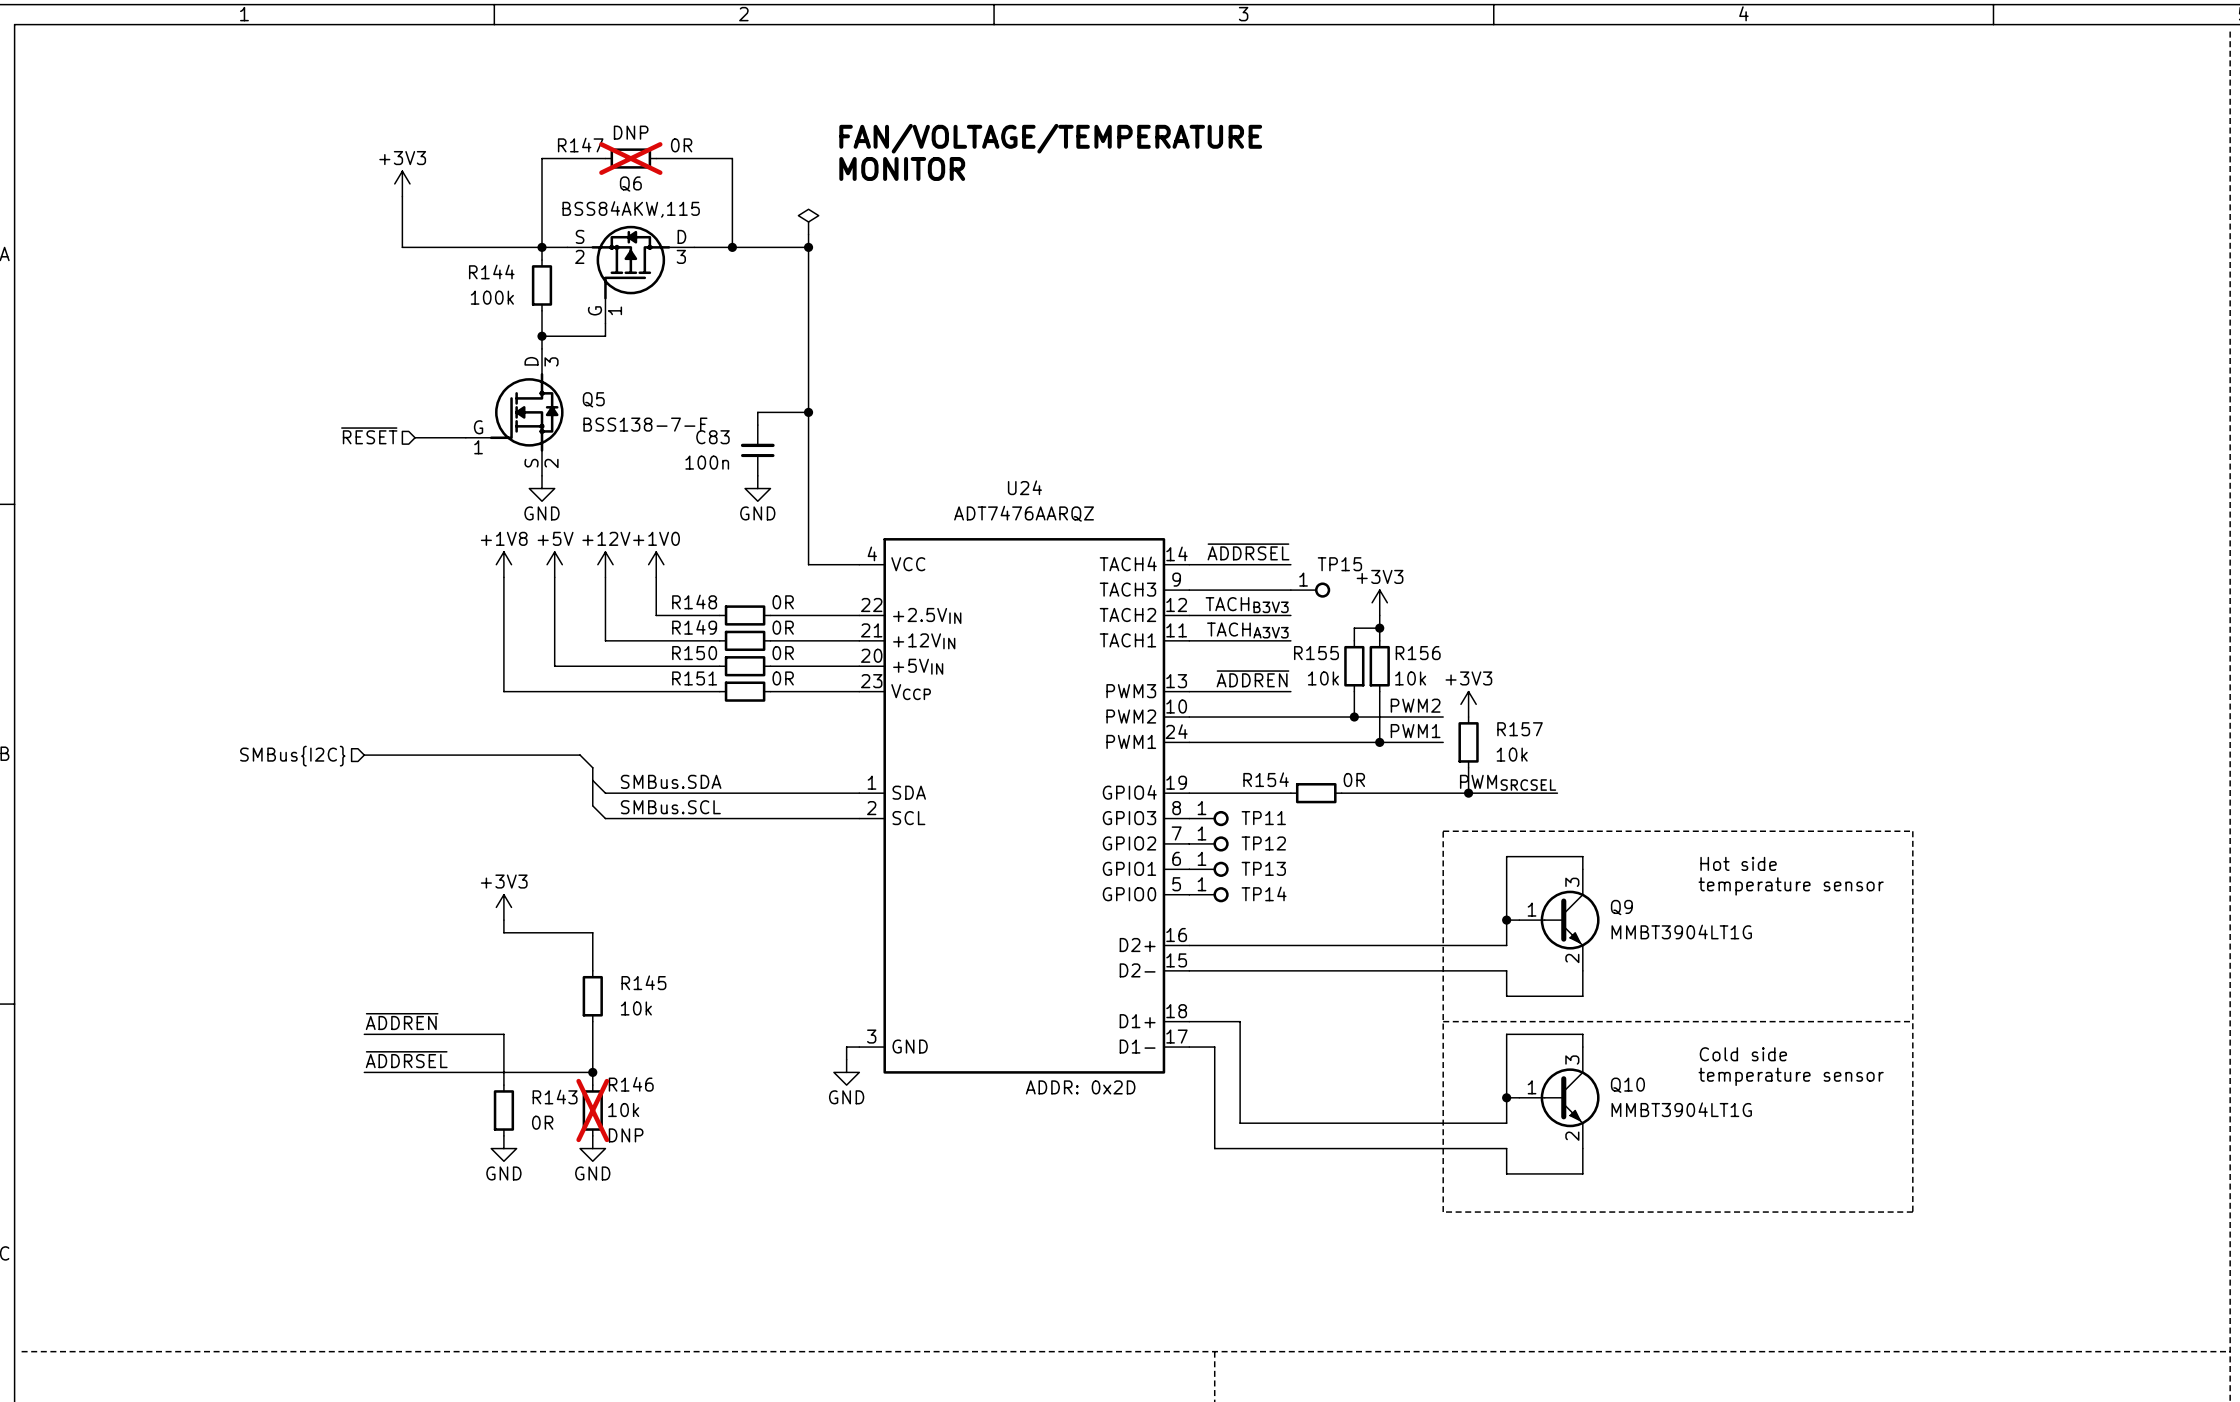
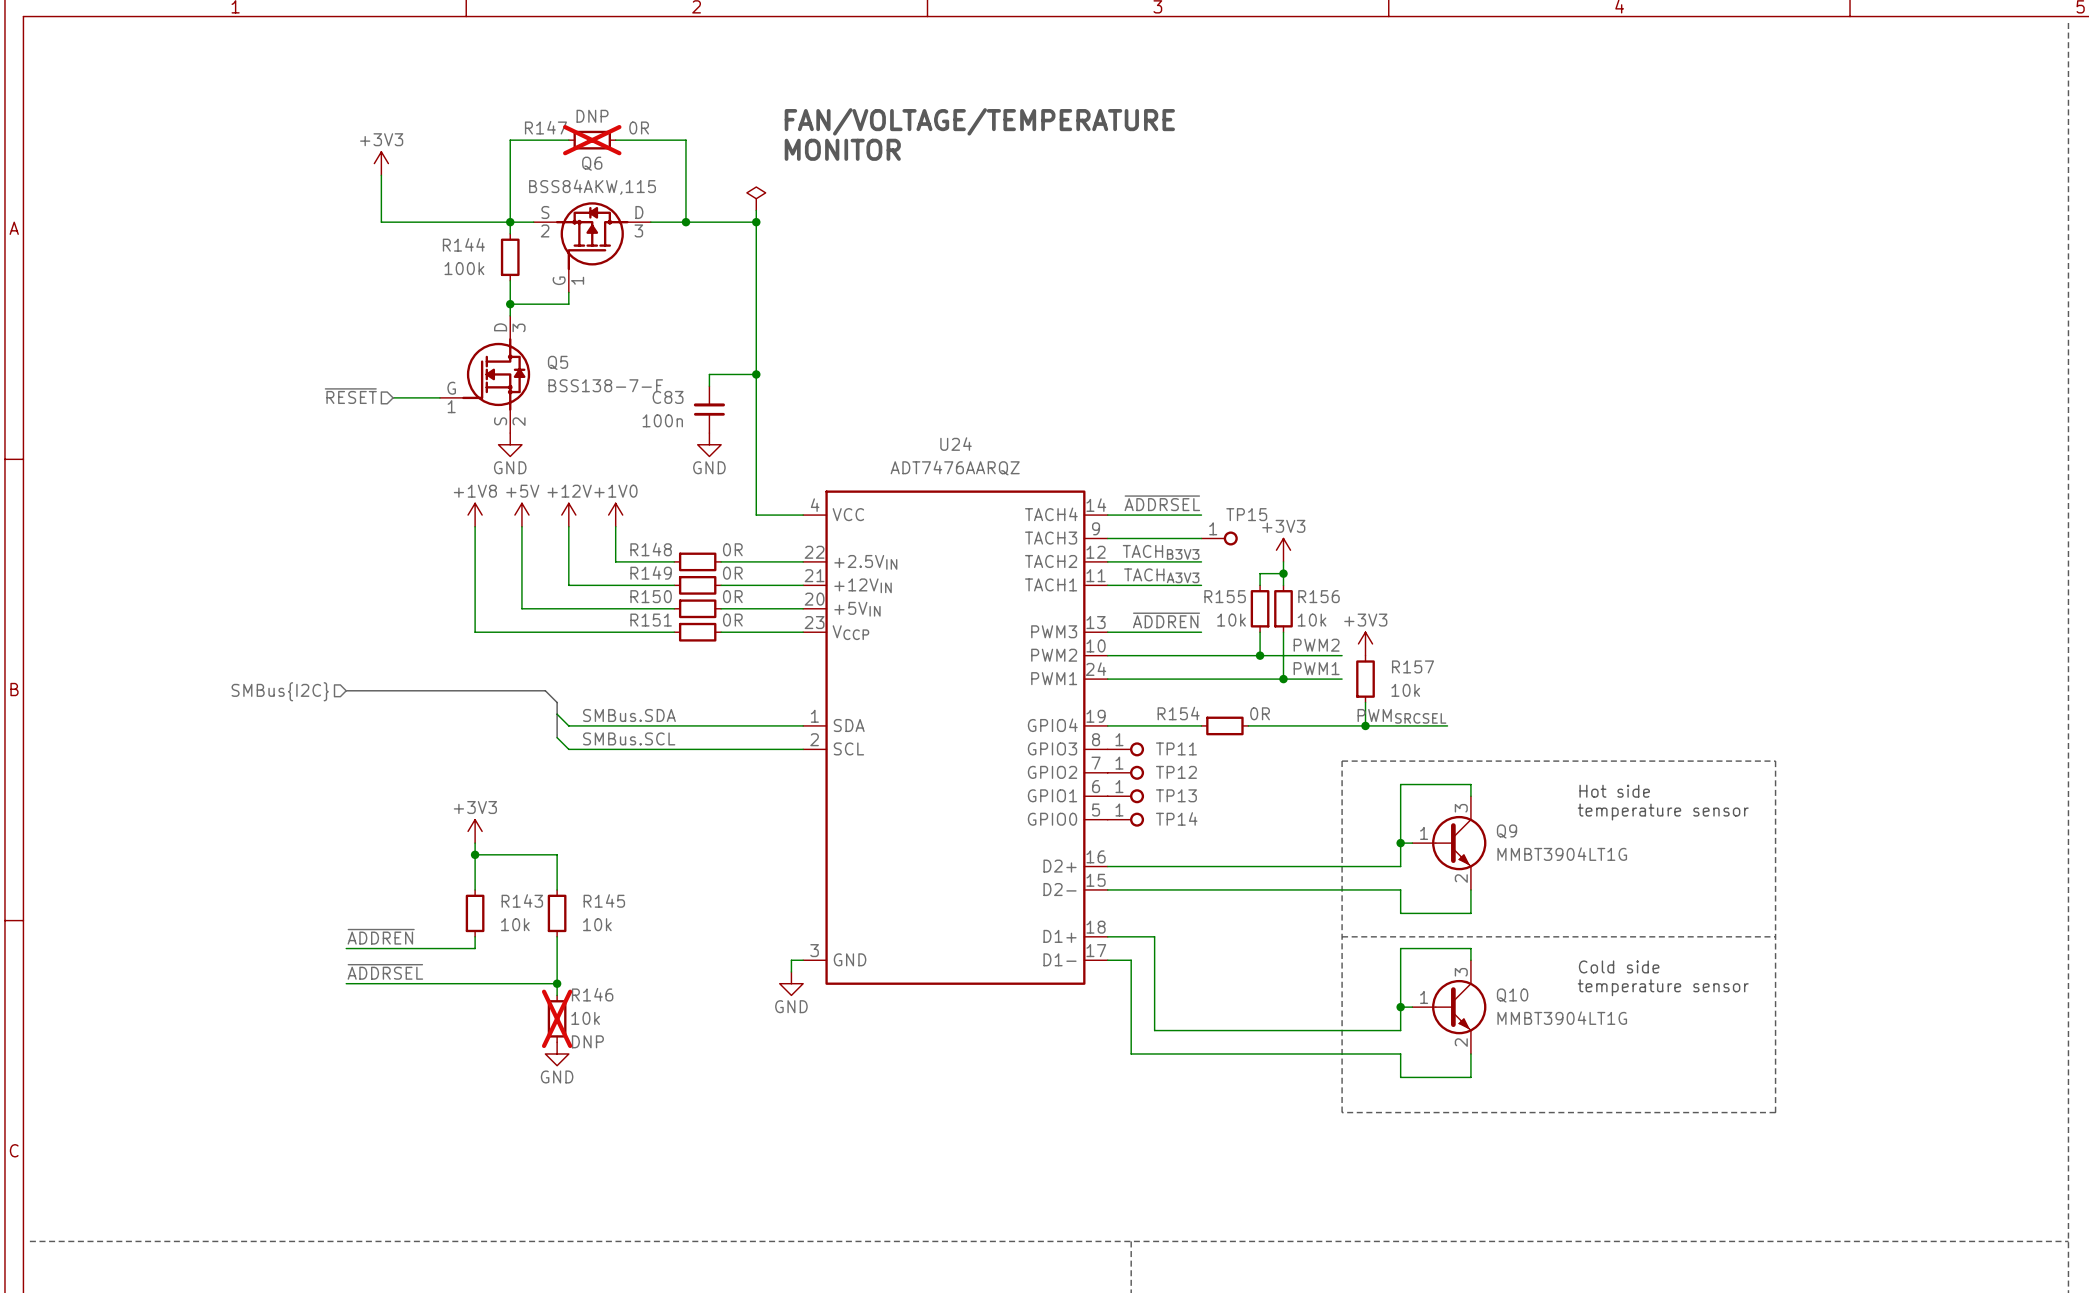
wire: none -> (475, 854) (475, 889)
junction: none -> (475, 854)
wire: (503, 1034) (503, 1085) -> (475, 948) (475, 936)
text: ADDR: 0x2D (1080, 1087) -> none
R143 position: (503, 1110) -> (475, 913)
R143 text: 0R (542, 1122) -> 10k (515, 924)
power symbol: GND (503, 1148) -> none

